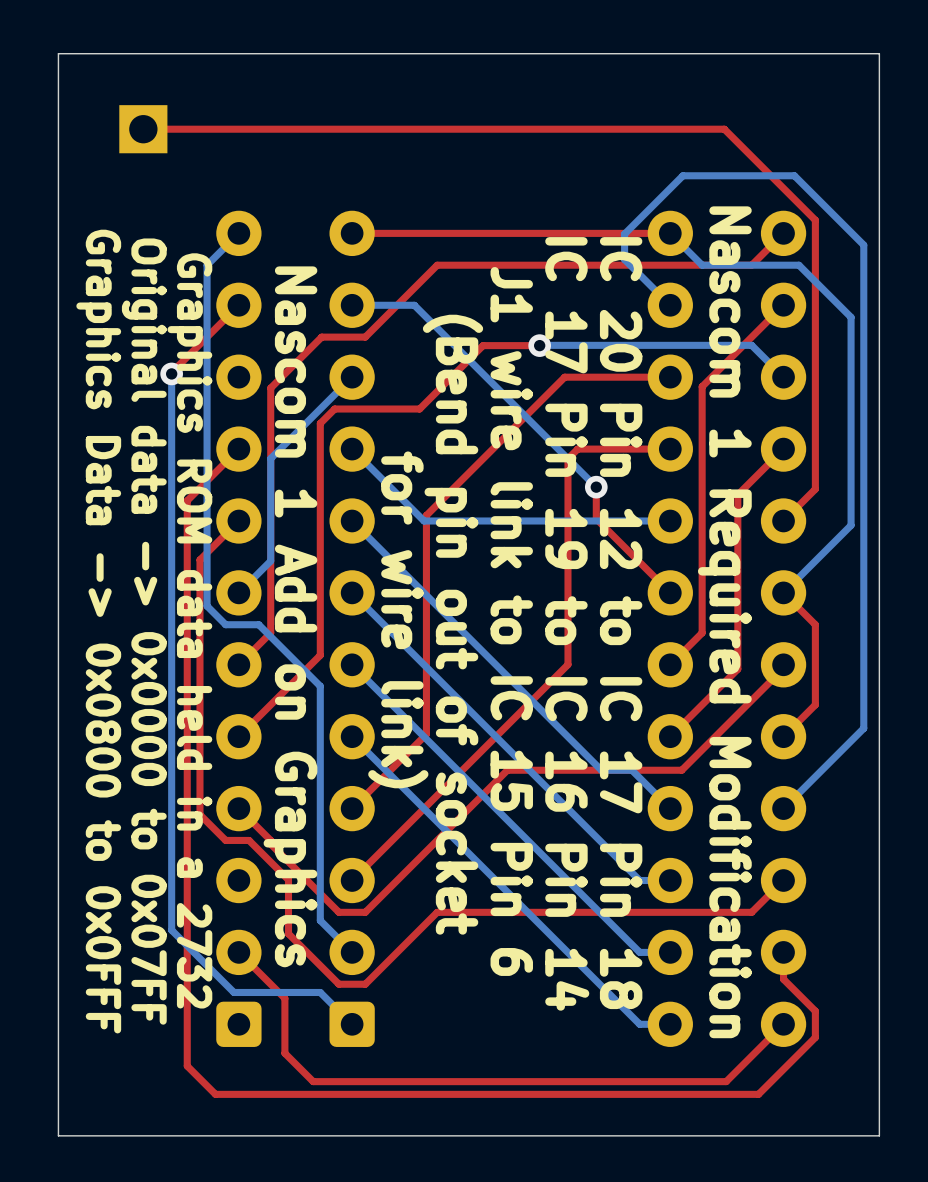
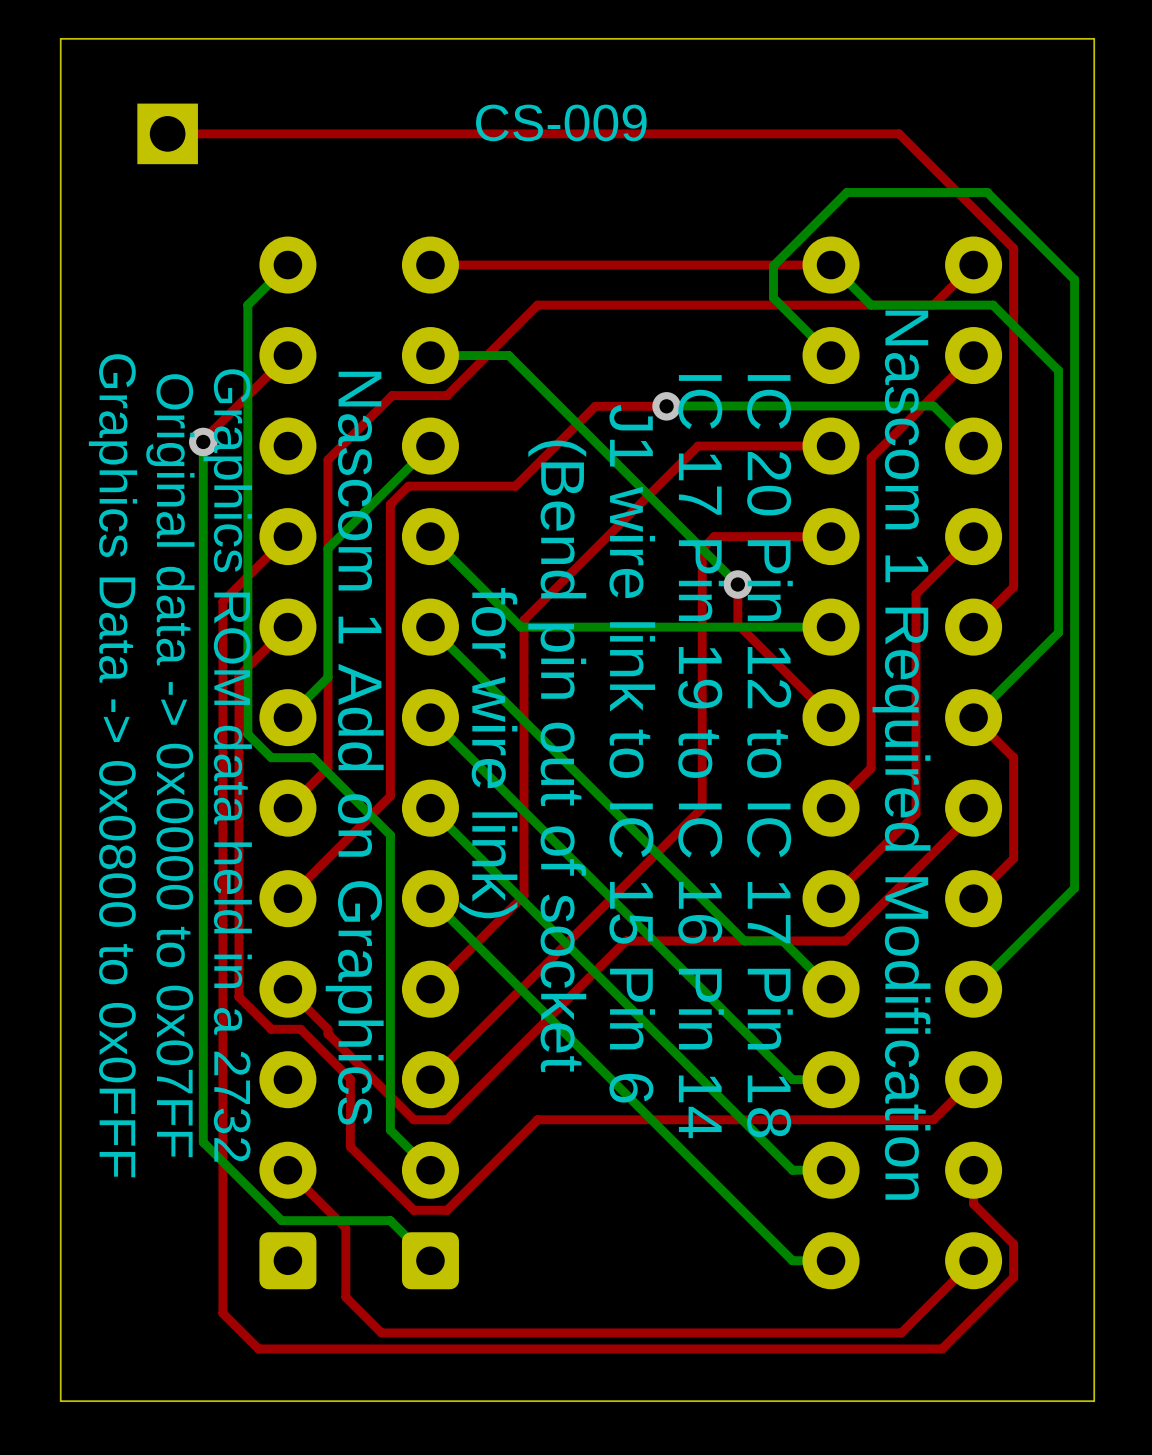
text: none -> CS-009 (561, 122)

